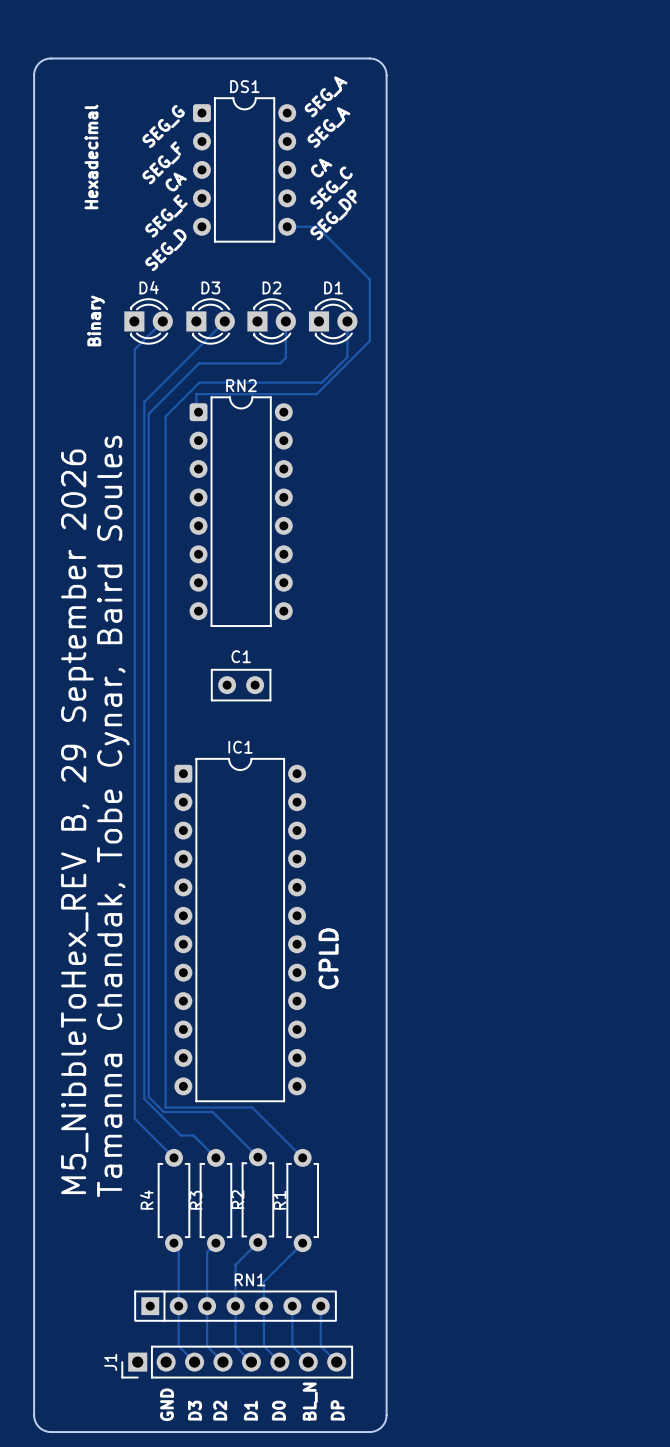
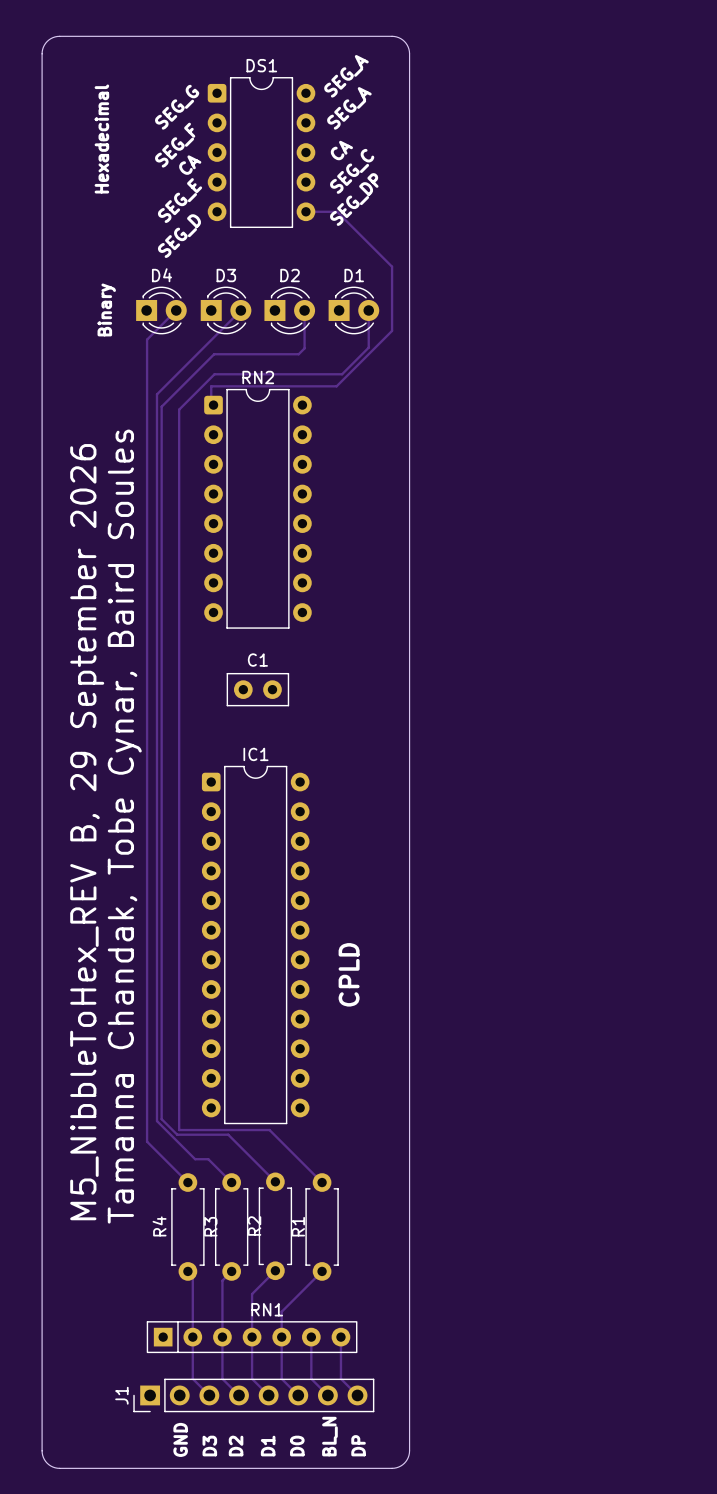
IC1 footprint: [174, 758, 307, 1102] -> [201, 765, 310, 1125]

